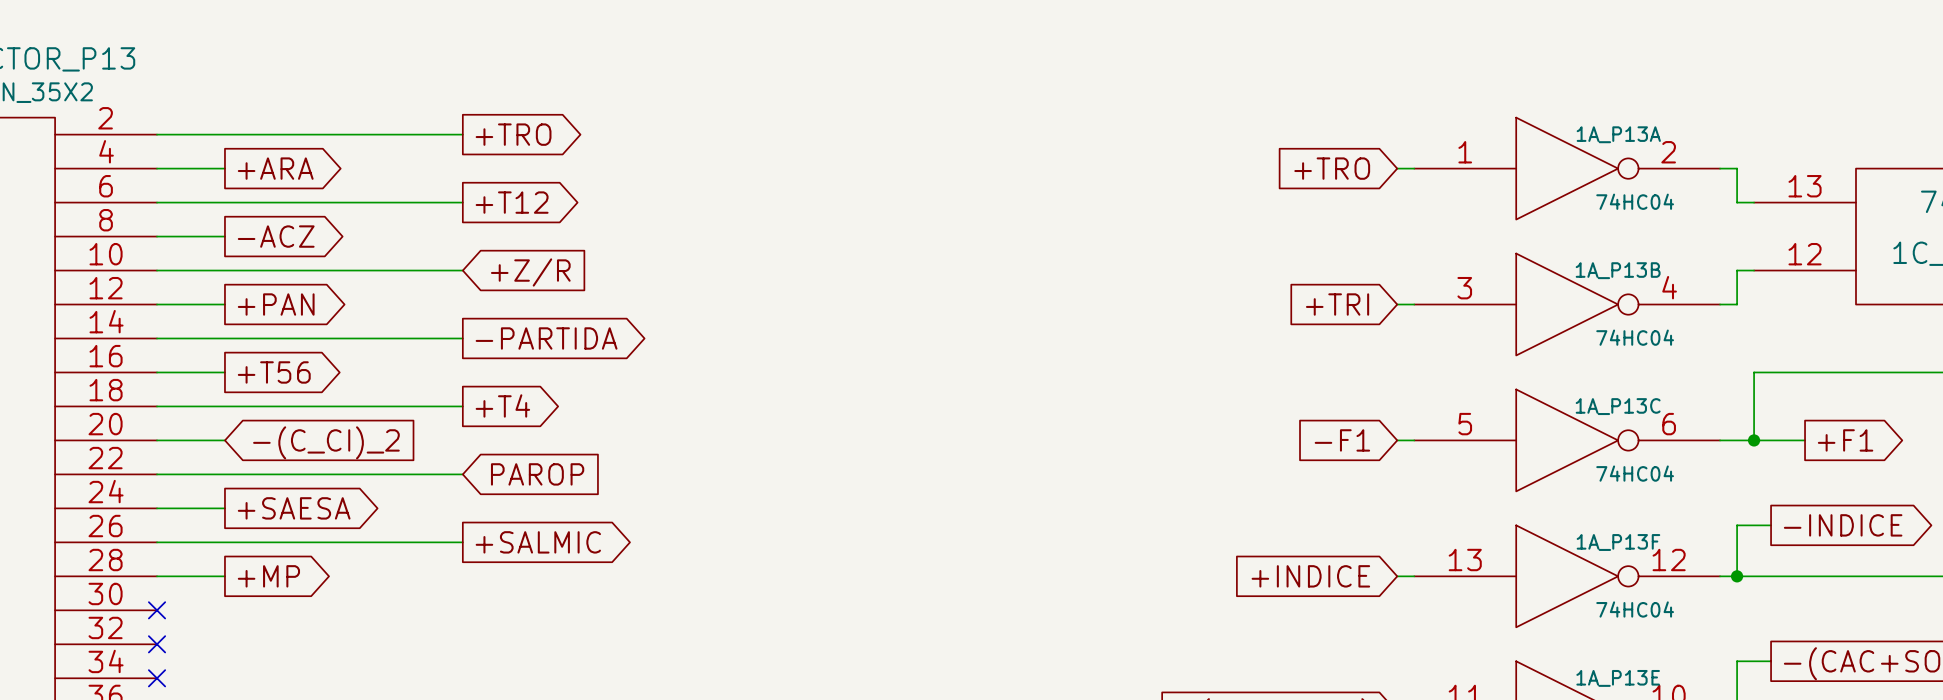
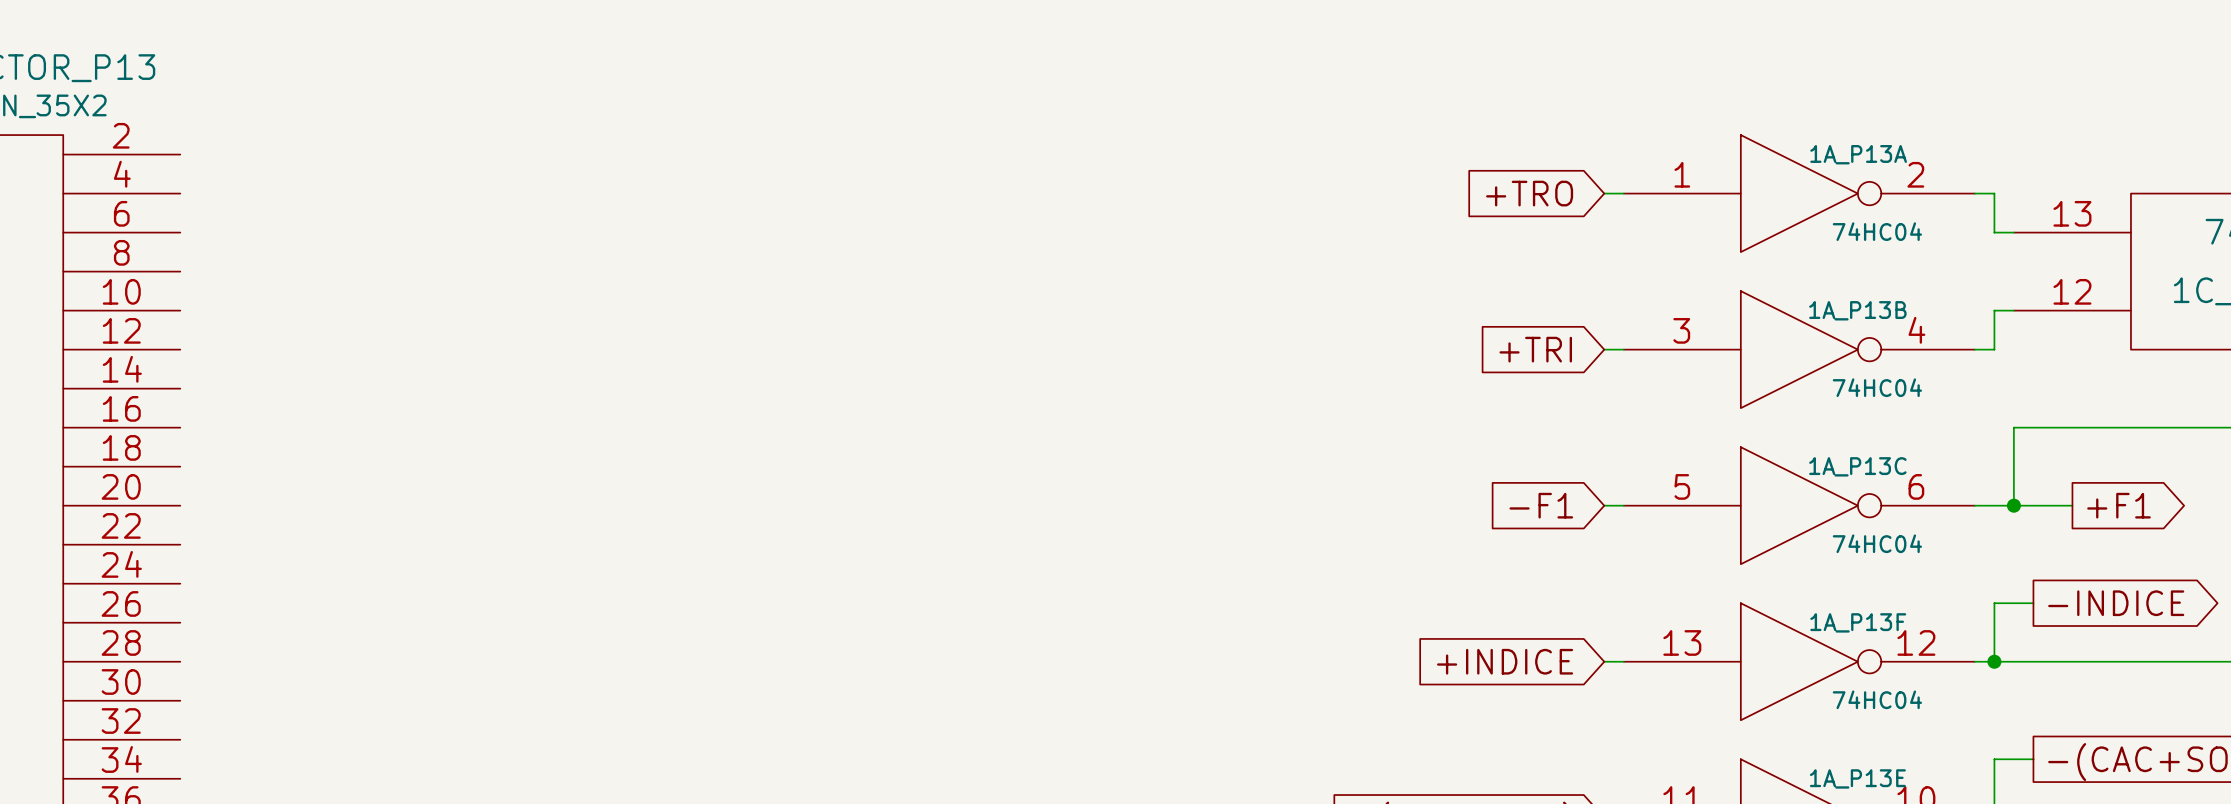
wire: (157, 134) (462, 134) -> none
global label: +TRO (513, 134) -> none
wire: (157, 168) (224, 168) -> none
global label: +ARA (275, 168) -> none
wire: (157, 202) (462, 202) -> none
global label: +T12 (512, 202) -> none
wire: (157, 236) (224, 236) -> none
global label: -ACZ (276, 236) -> none
wire: (157, 270) (462, 270) -> none
global label: +Z/R (530, 272) -> none
wire: (157, 304) (224, 304) -> none
global label: +PAN (276, 304) -> none
wire: (157, 338) (462, 338) -> none
global label: -PARTIDA (546, 338) -> none
wire: (157, 372) (224, 372) -> none
global label: +T56 (274, 372) -> none
global label: +T4 (502, 405) -> none
wire: (157, 406) (462, 406) -> none
wire: (157, 440) (224, 440) -> none
global label: -(C_CI)_2 (326, 442) -> none
wire: (157, 474) (462, 474) -> none
global label: PAROP (537, 474) -> none
wire: (157, 508) (224, 508) -> none
global label: +SAESA (294, 508) -> none
wire: (157, 542) (462, 542) -> none
global label: +SALMIC (538, 542) -> none
wire: (157, 576) (224, 576) -> none
global label: +MP (268, 576) -> none
no-connect mark: (157, 610) -> none
no-connect mark: (157, 644) -> none
no-connect mark: (157, 678) -> none

